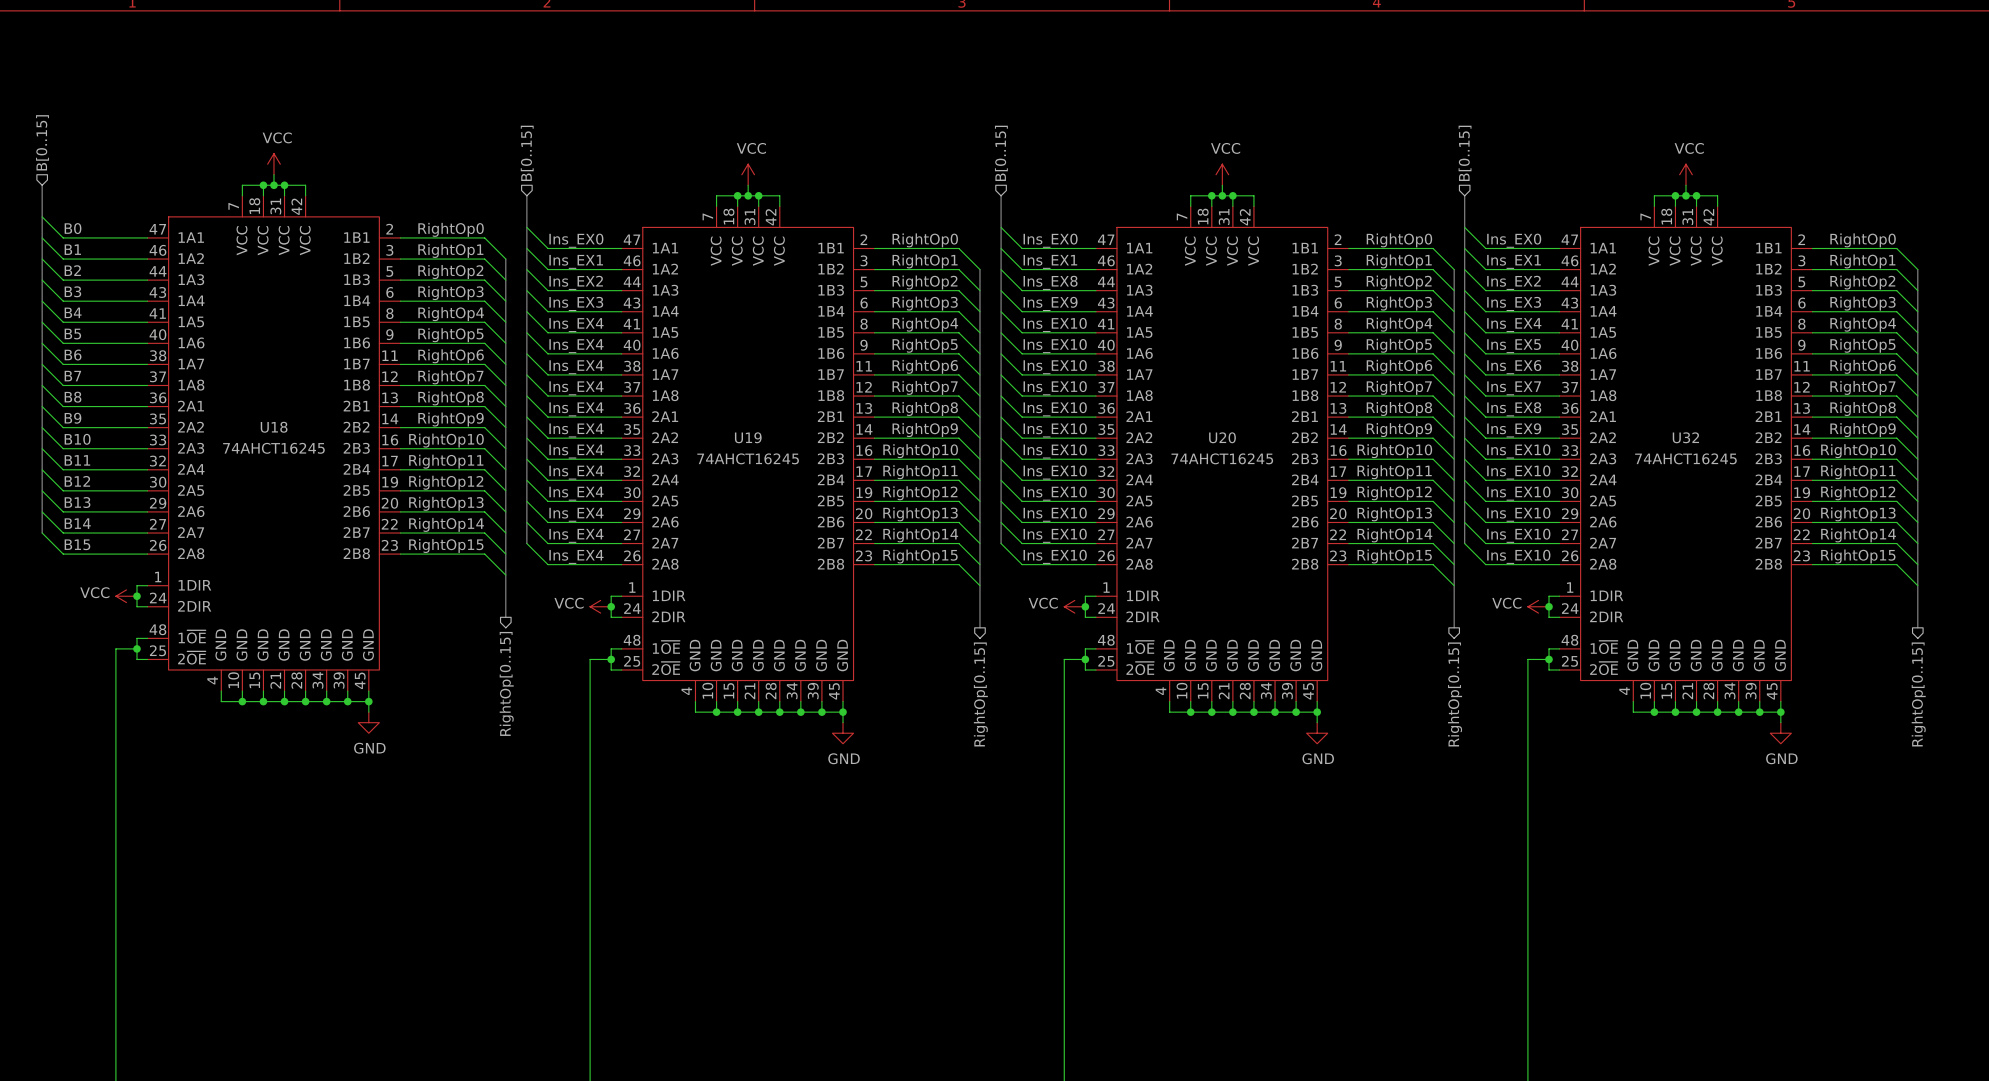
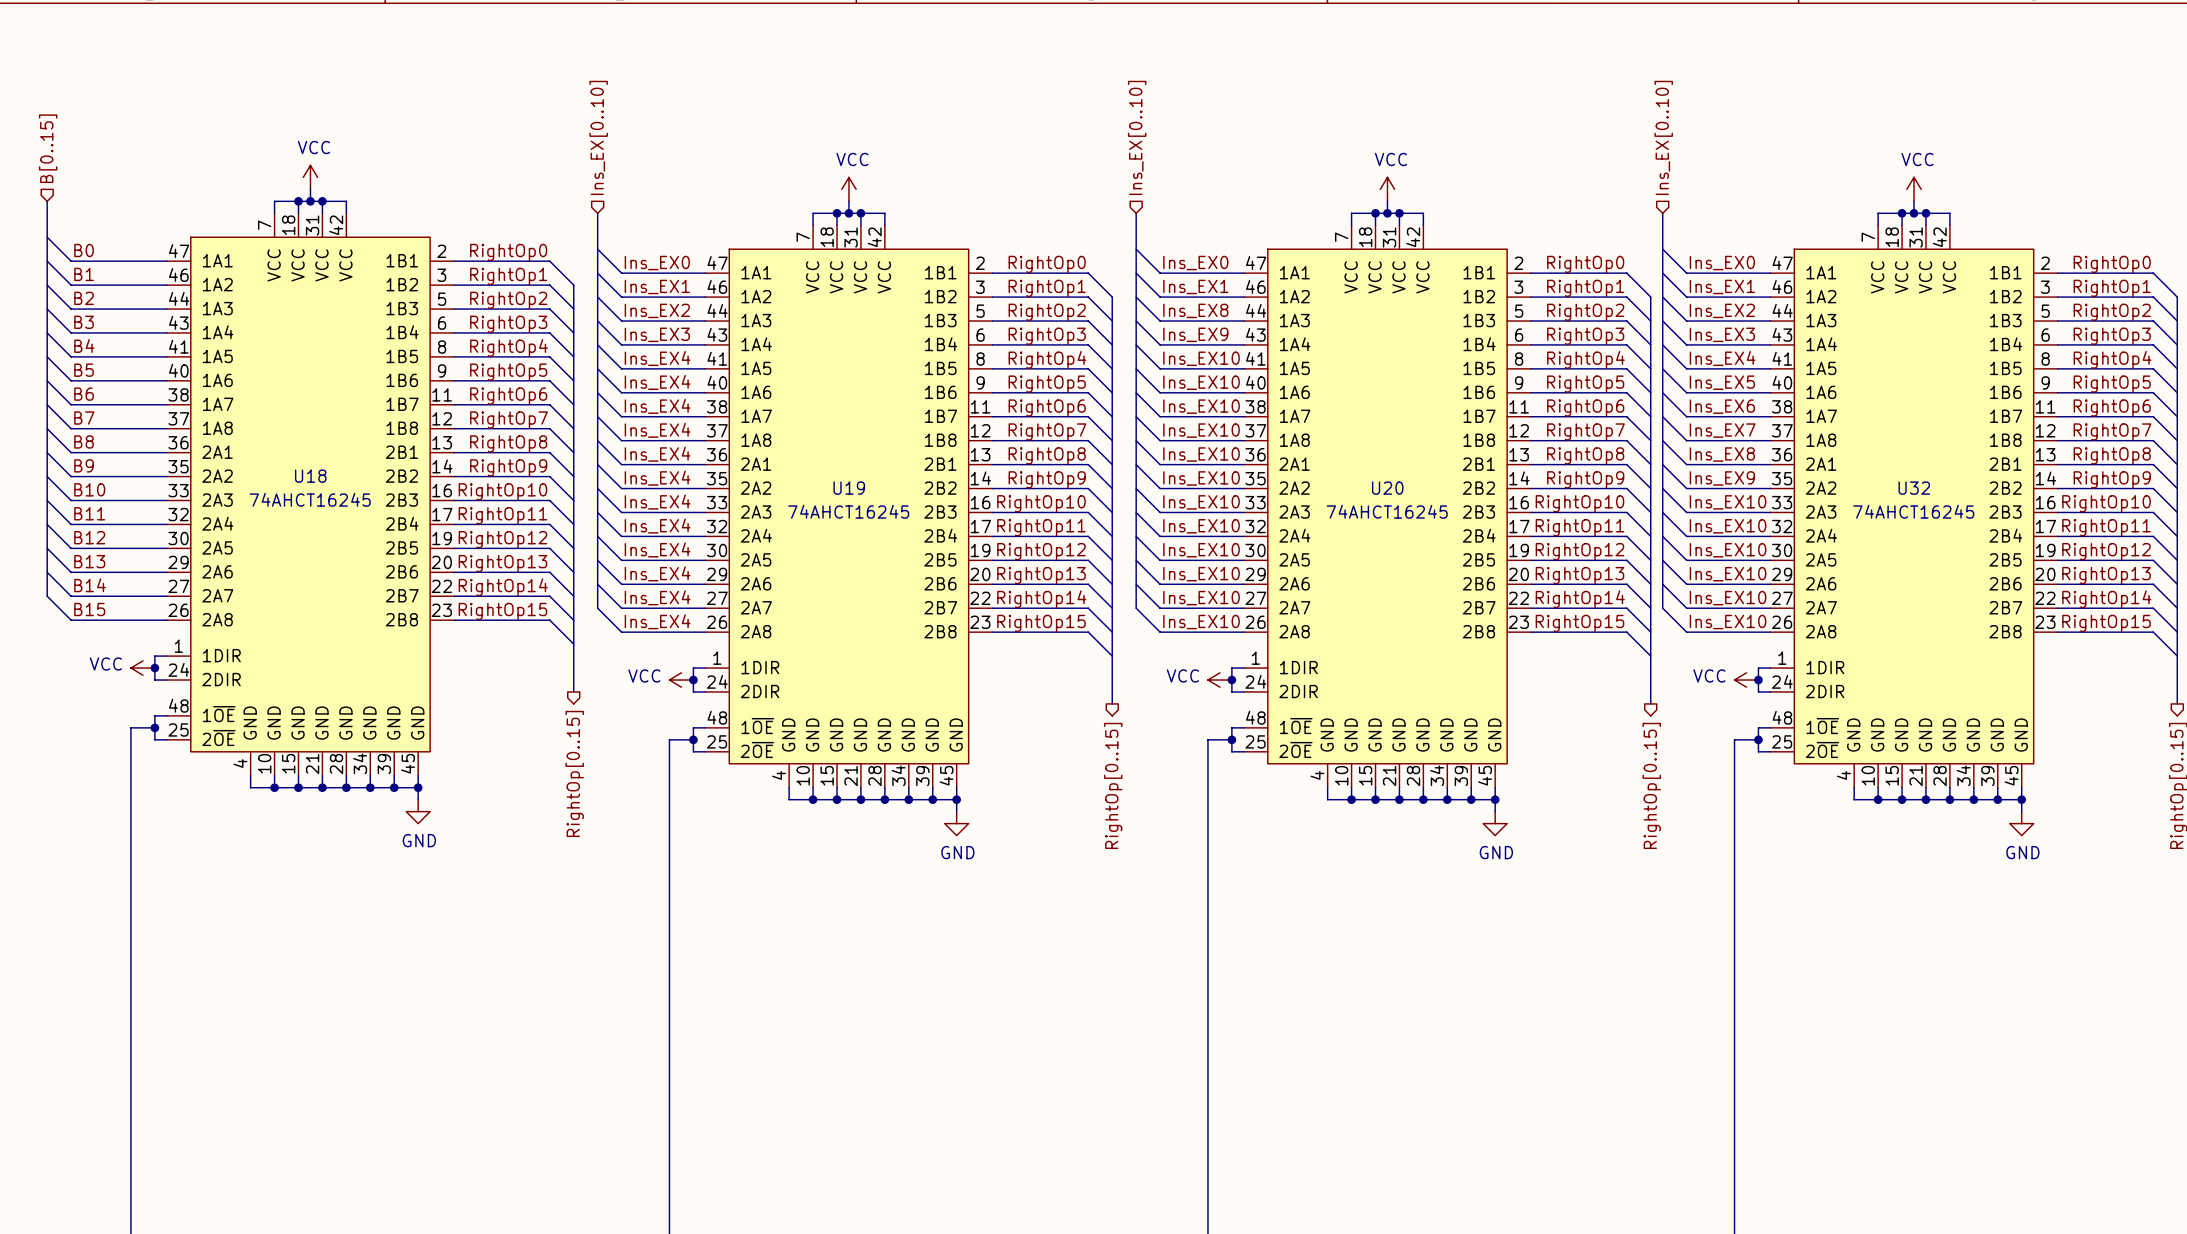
hierarchical label: B[0..15] (527, 153) -> Ins_EX[0..10] (598, 137)
hierarchical label: B[0..15] (1001, 153) -> Ins_EX[0..10] (1137, 137)
hierarchical label: B[0..15] (1465, 153) -> Ins_EX[0..10] (1663, 137)

